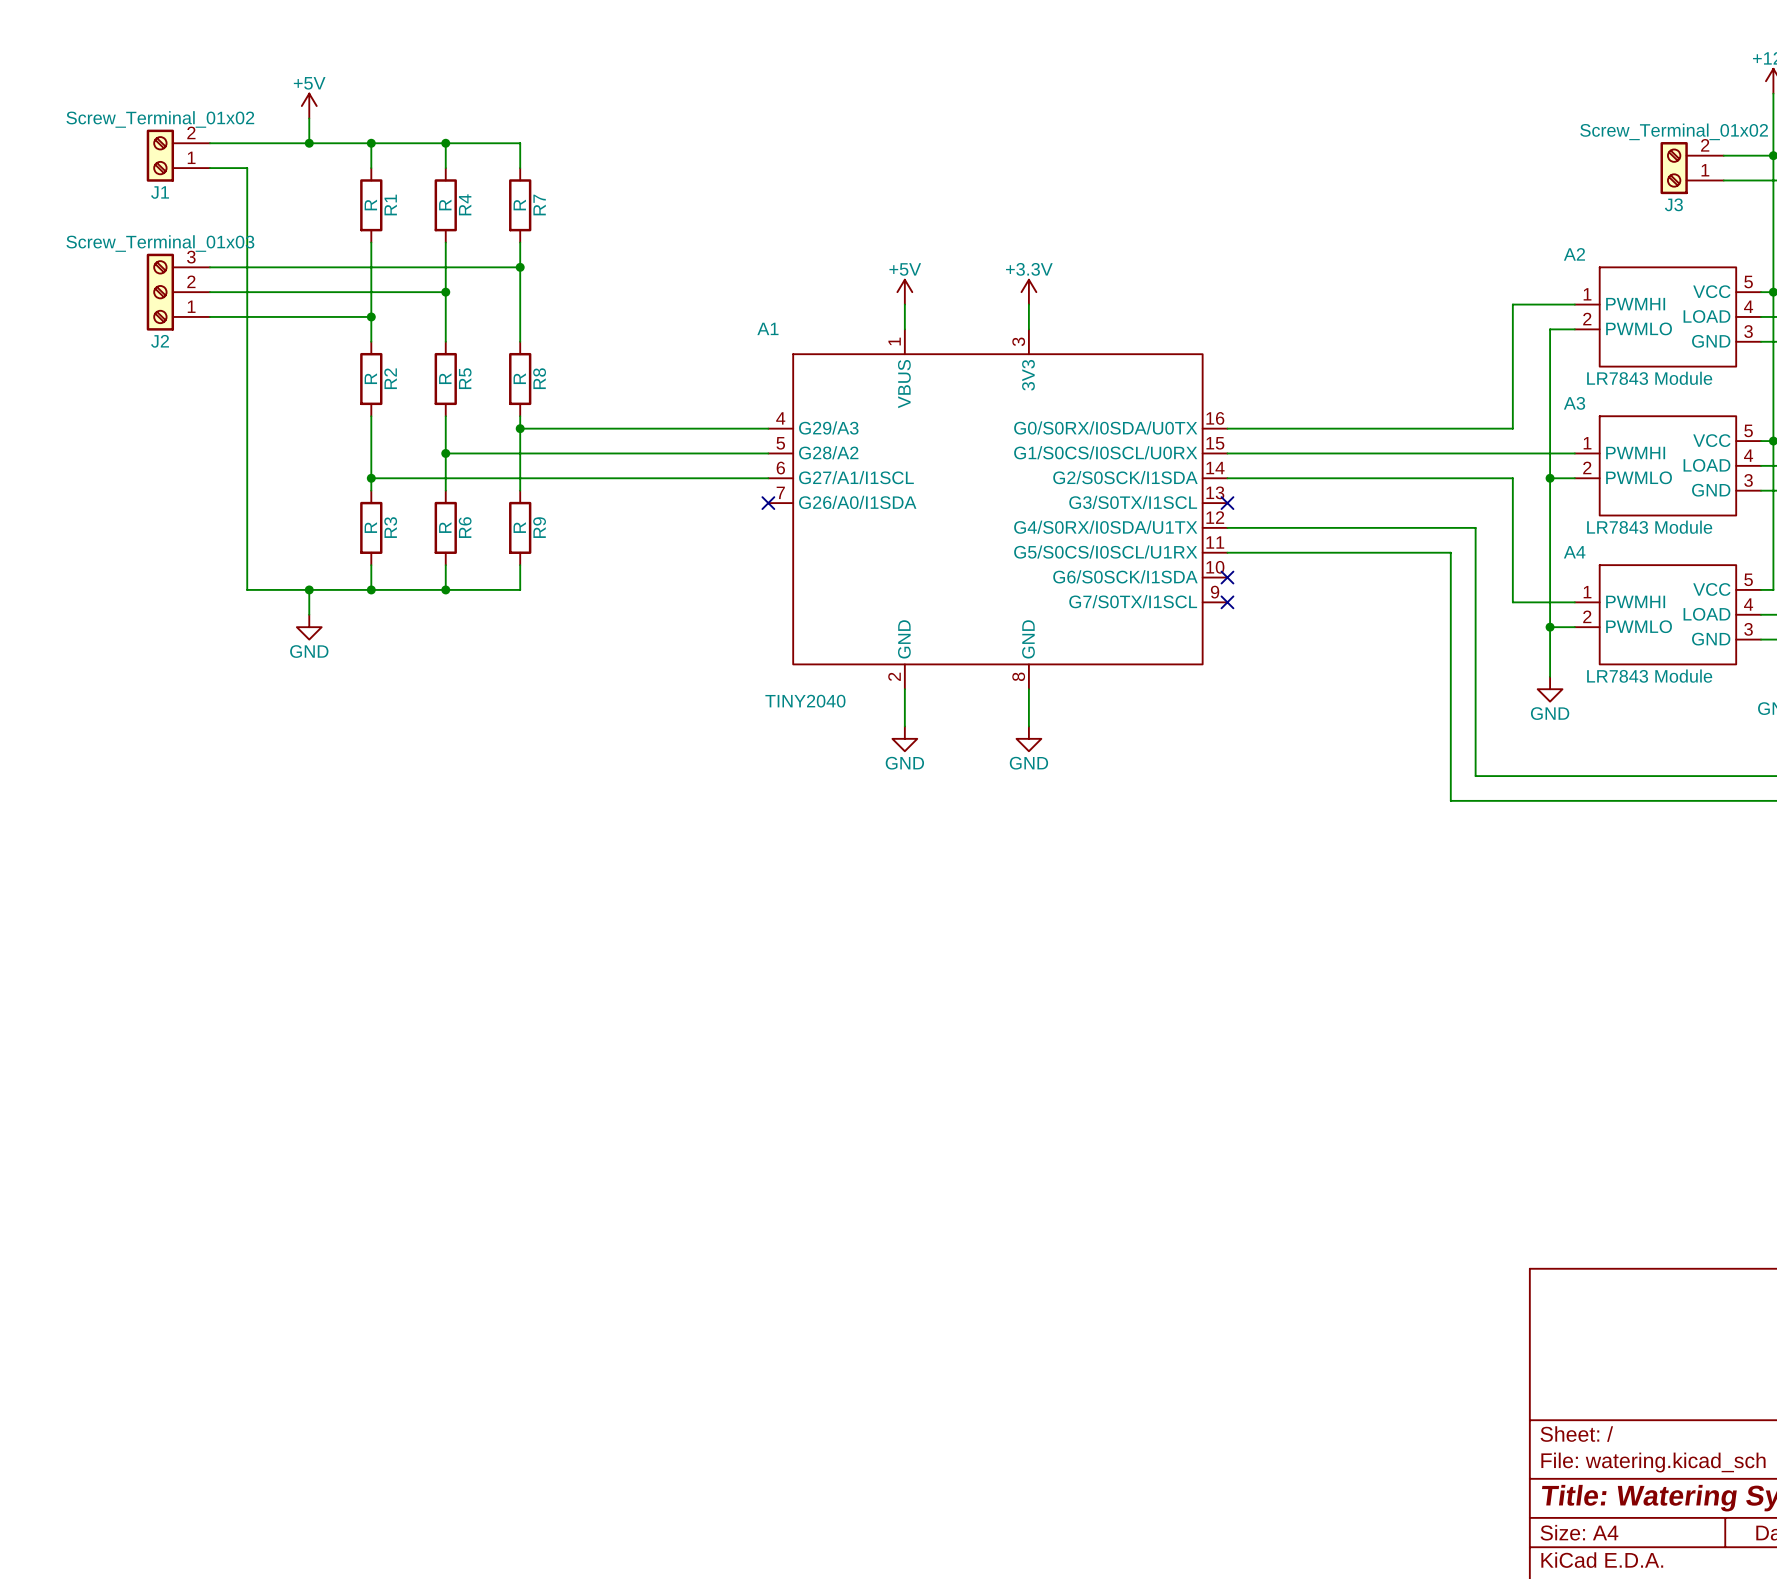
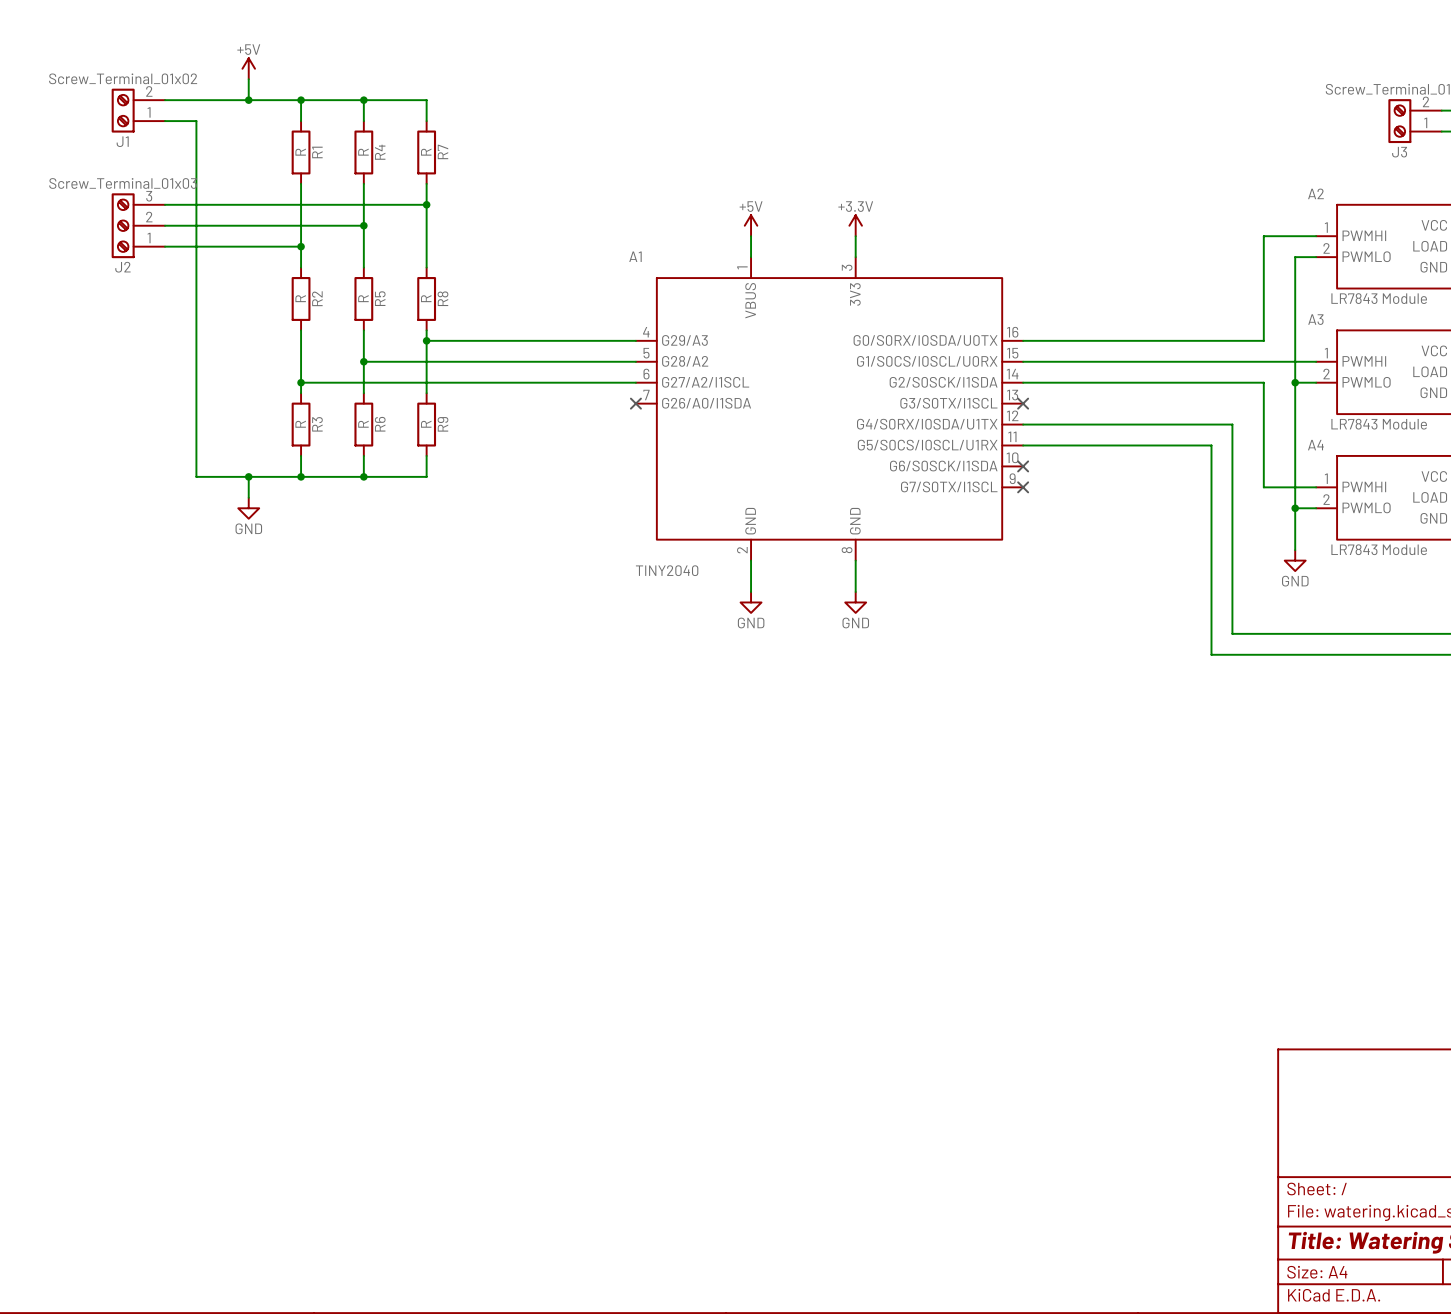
A1 pin name: G27/A1/I1SCL (856, 477) -> G27/A2/I1SCL (705, 382)

